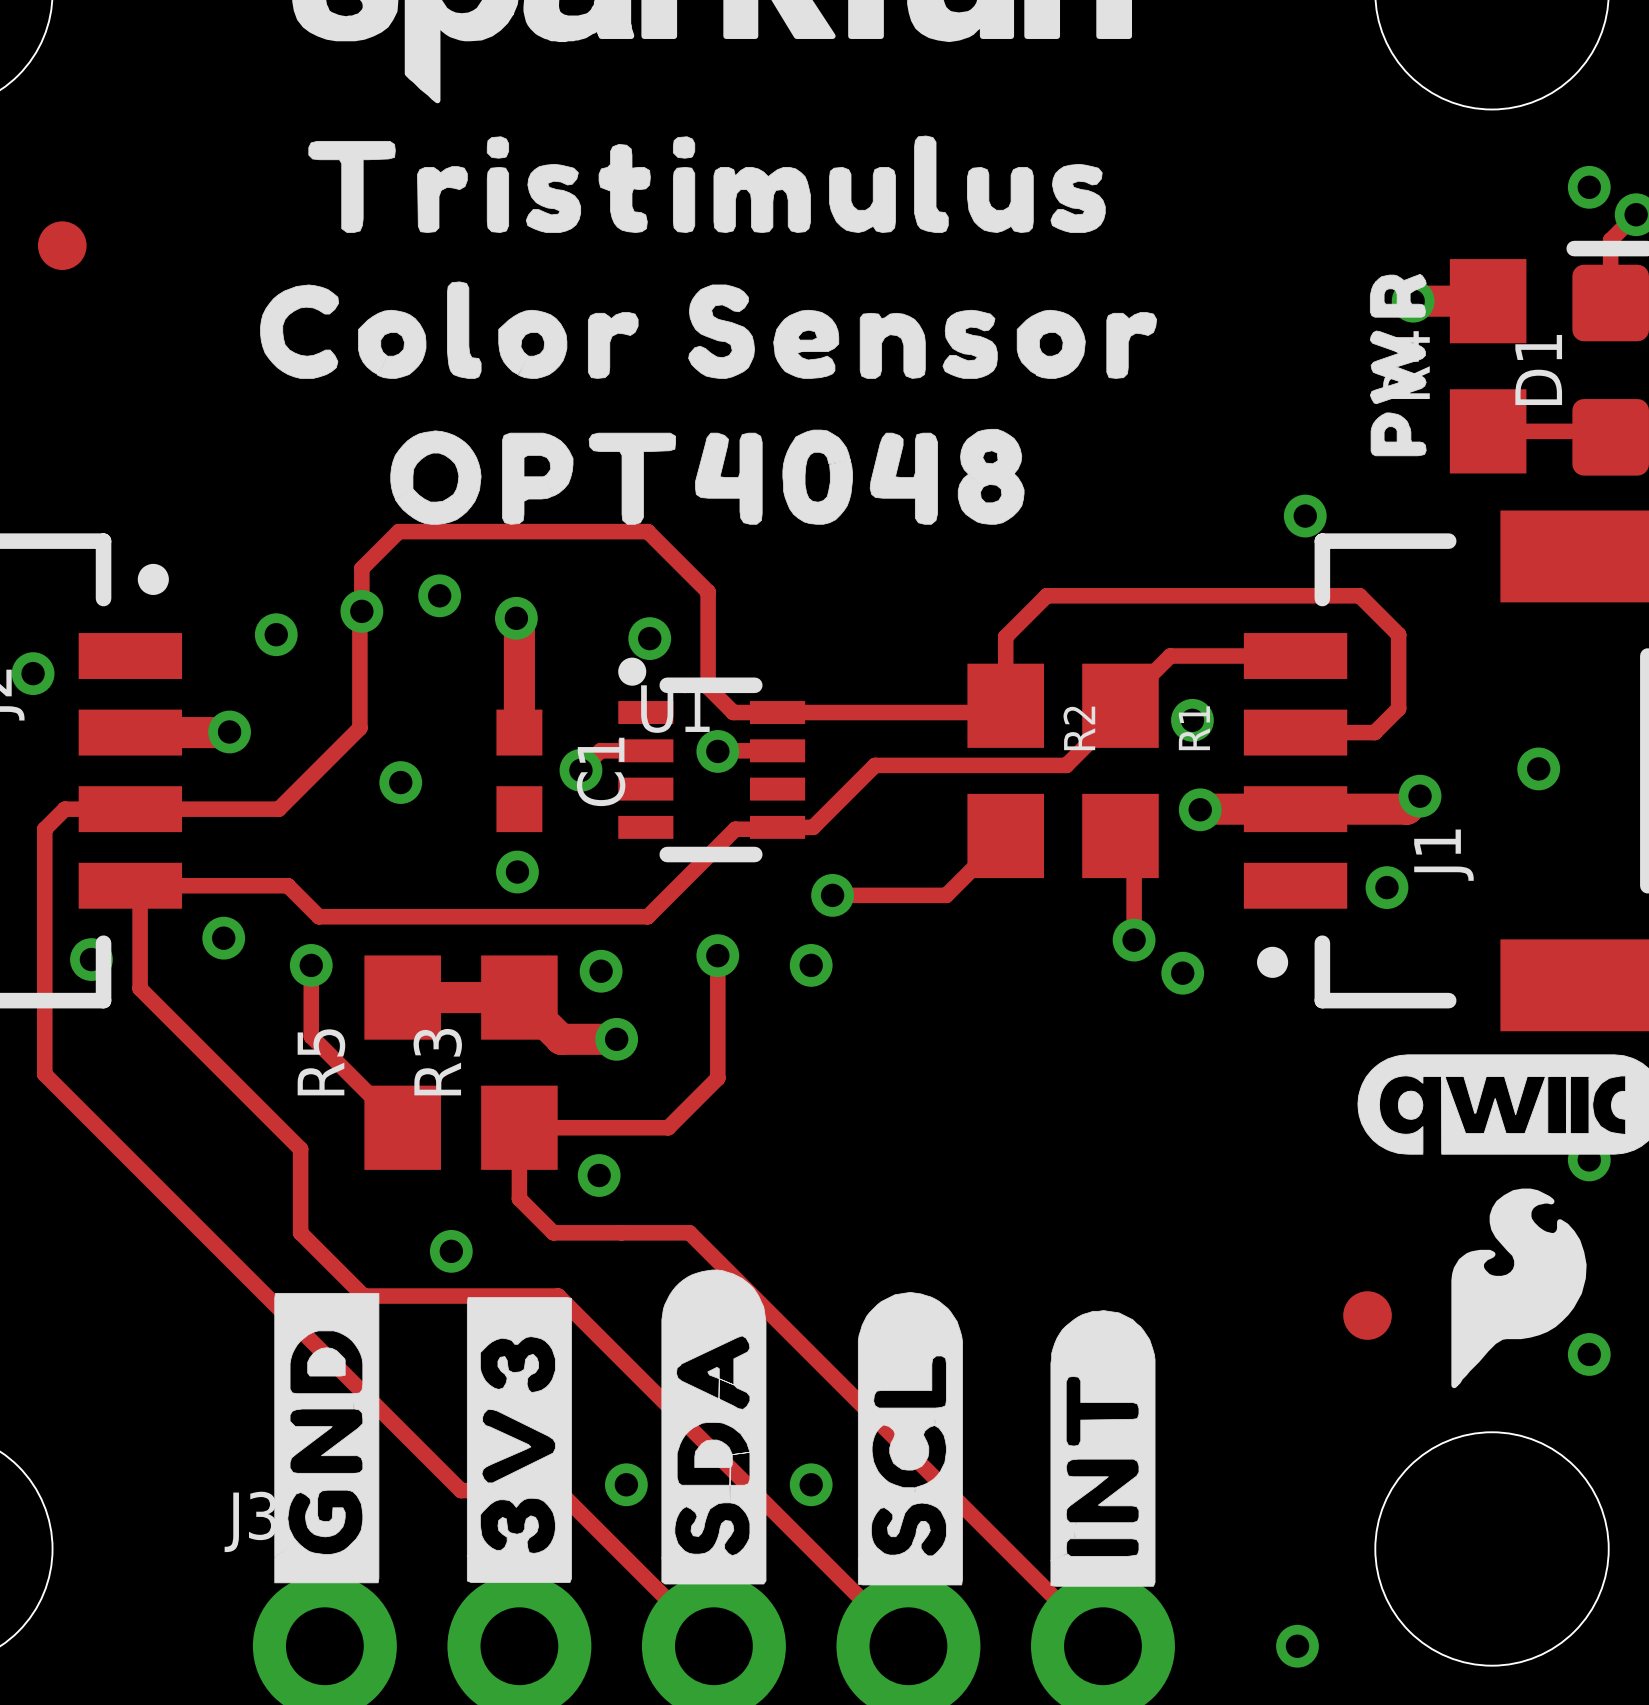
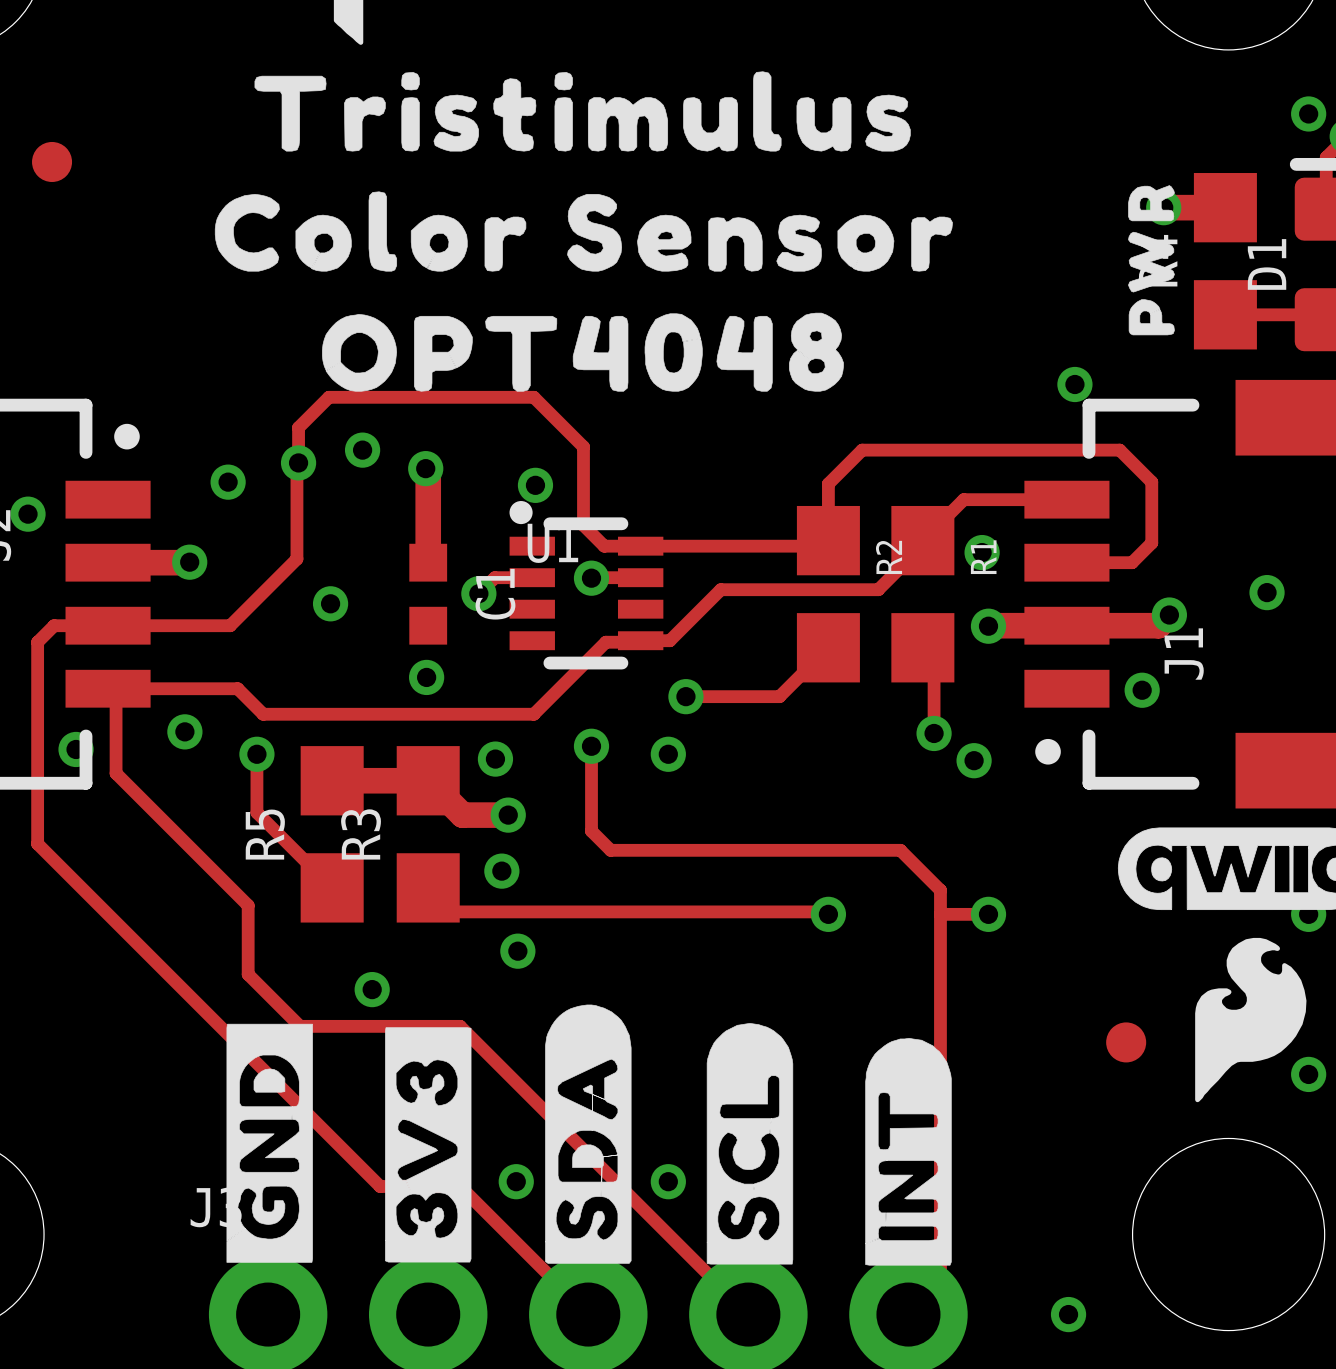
track: (717, 1058) (717, 1078) (668, 1127) (519, 1127) (519, 1198) (553, 1232) (689, 1232) (1102, 1646) -> (591, 831) (610, 850) (900, 850) (940, 890) (940, 1282) (908, 1314)
via: none -> (501, 871)
track: none -> (428, 887) (452, 911) (825, 911) (828, 914)
via: none -> (828, 914)
track: none -> (940, 914) (988, 914)
via: none -> (988, 914)
via position: (599, 1175) -> (517, 951)

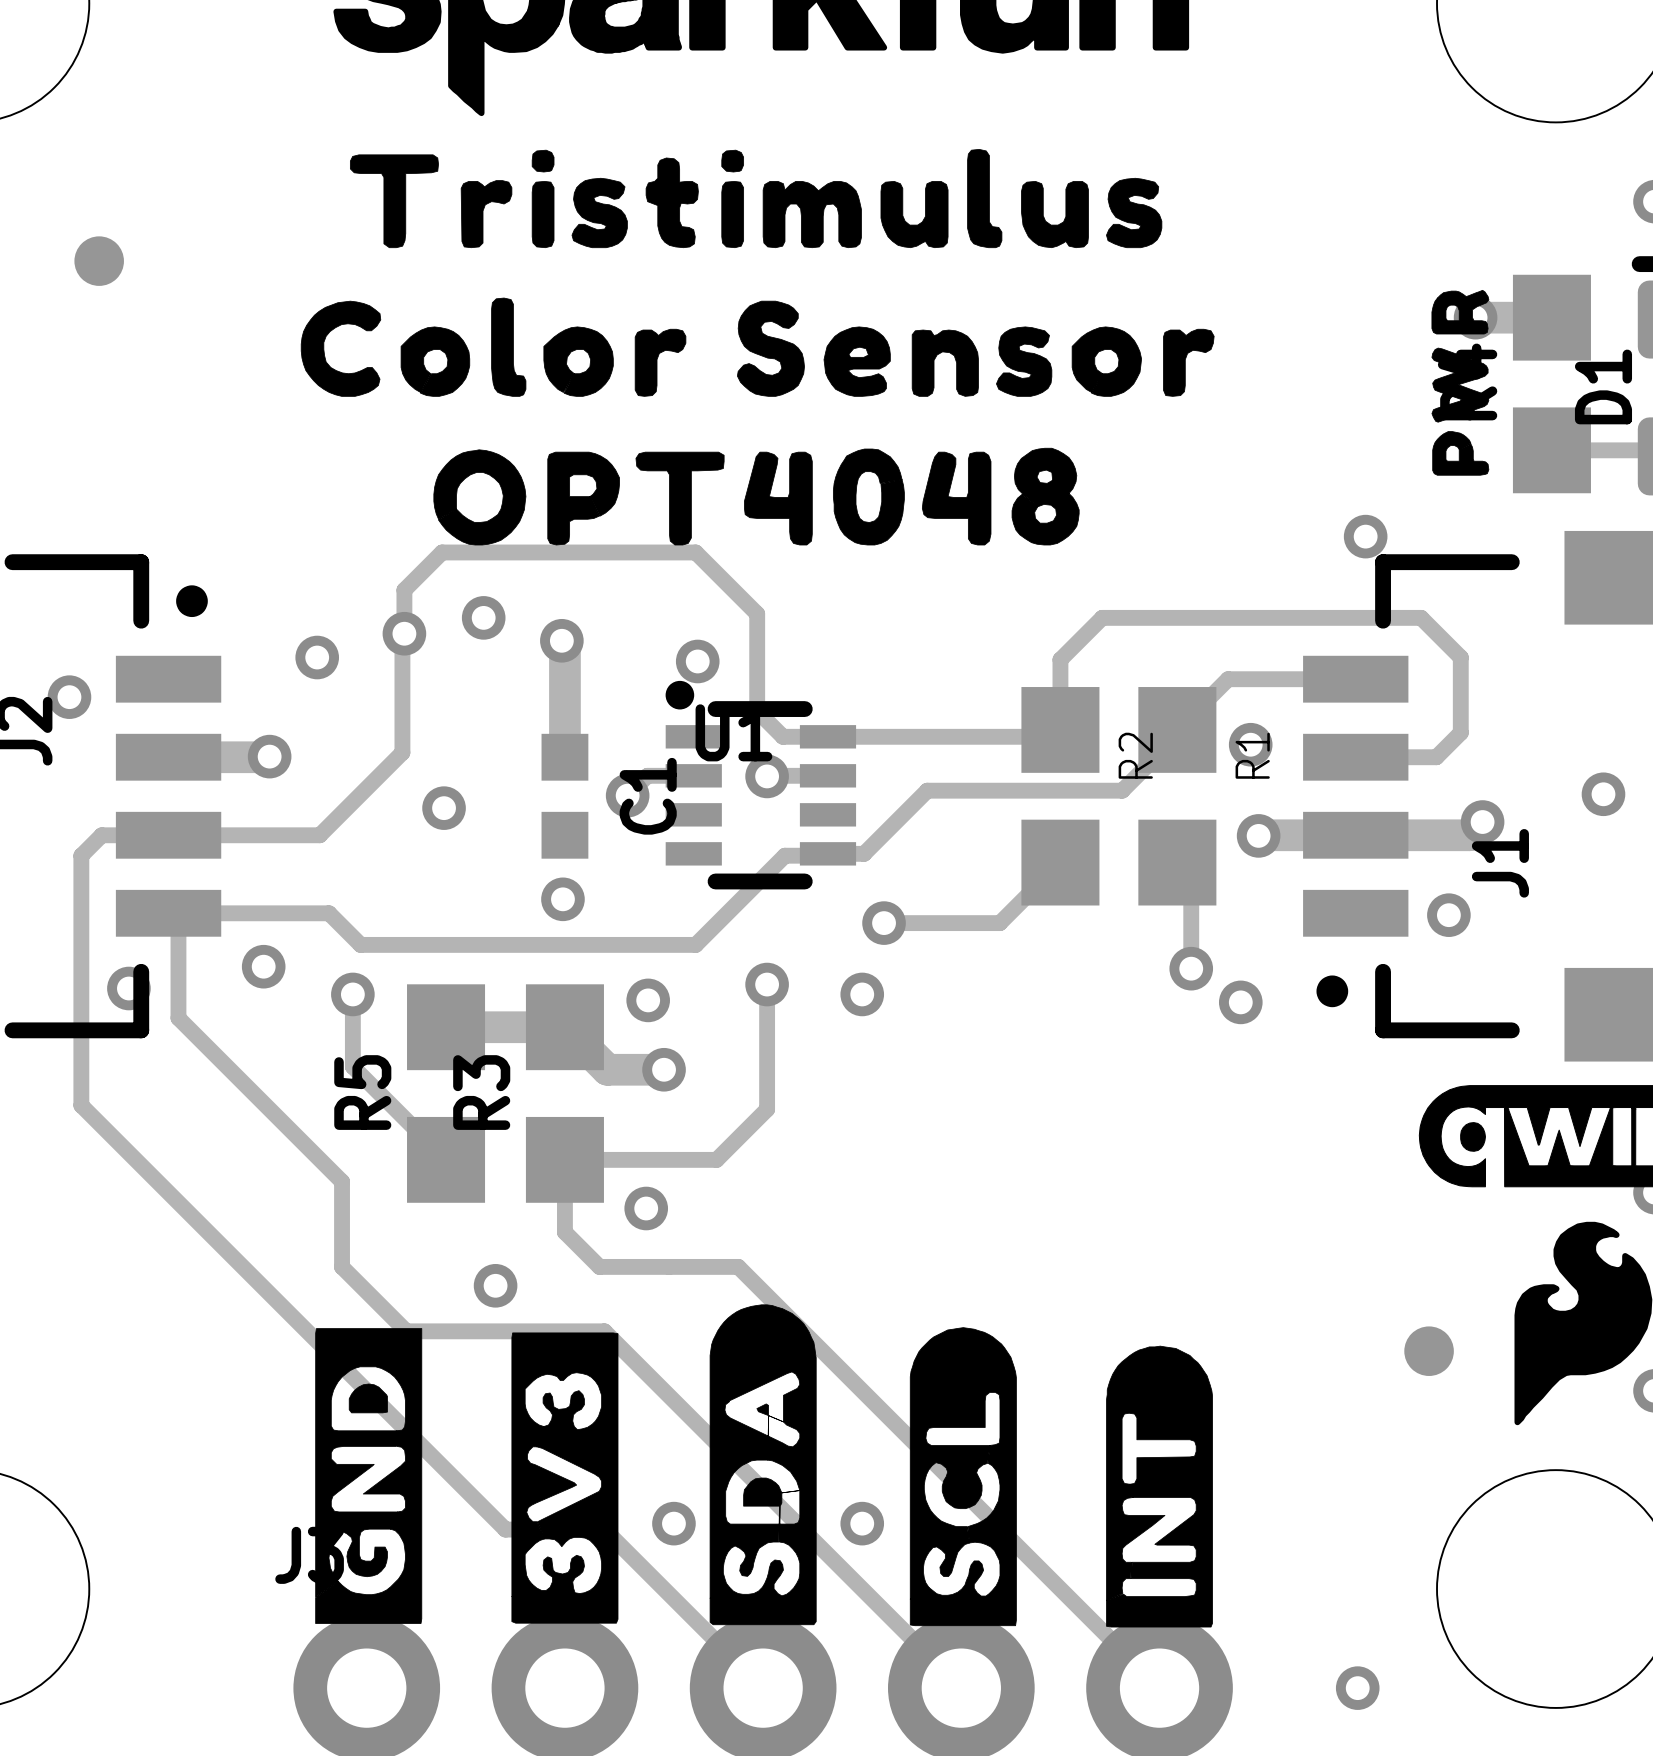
track: (591, 831) (610, 850) (900, 850) (940, 890) (940, 1282) (908, 1314) -> (767, 1089) (767, 1109) (716, 1159) (564, 1159) (564, 1232) (599, 1266) (738, 1266) (1159, 1688)
via: (501, 871) -> none
track: (428, 887) (452, 911) (825, 911) (828, 914) -> none
via: (828, 914) -> none
track: (940, 914) (988, 914) -> none
via: (988, 914) -> none
via position: (517, 951) -> (646, 1208)

